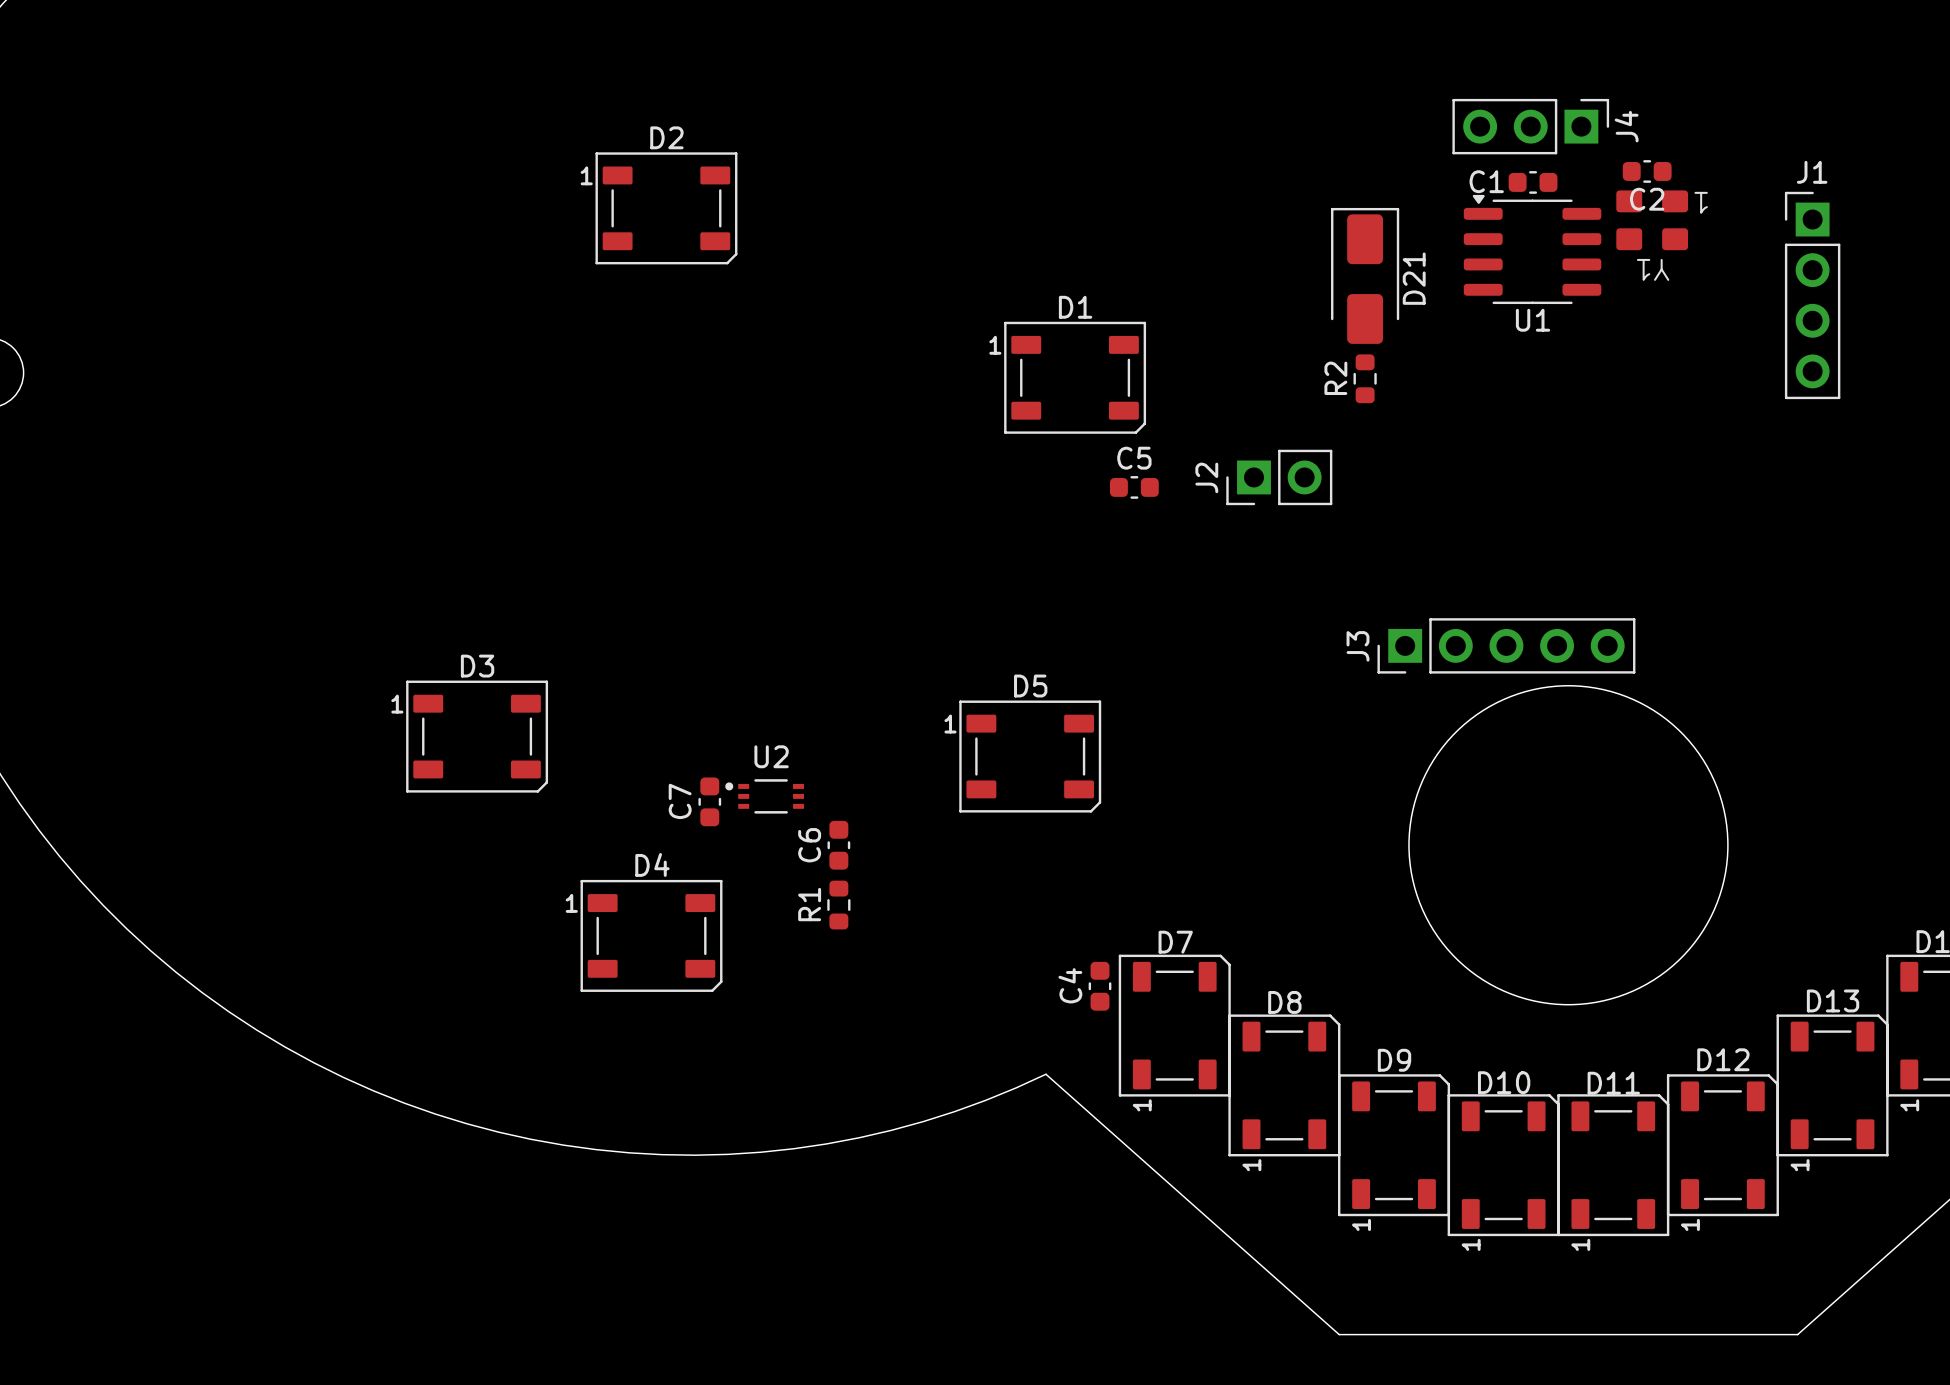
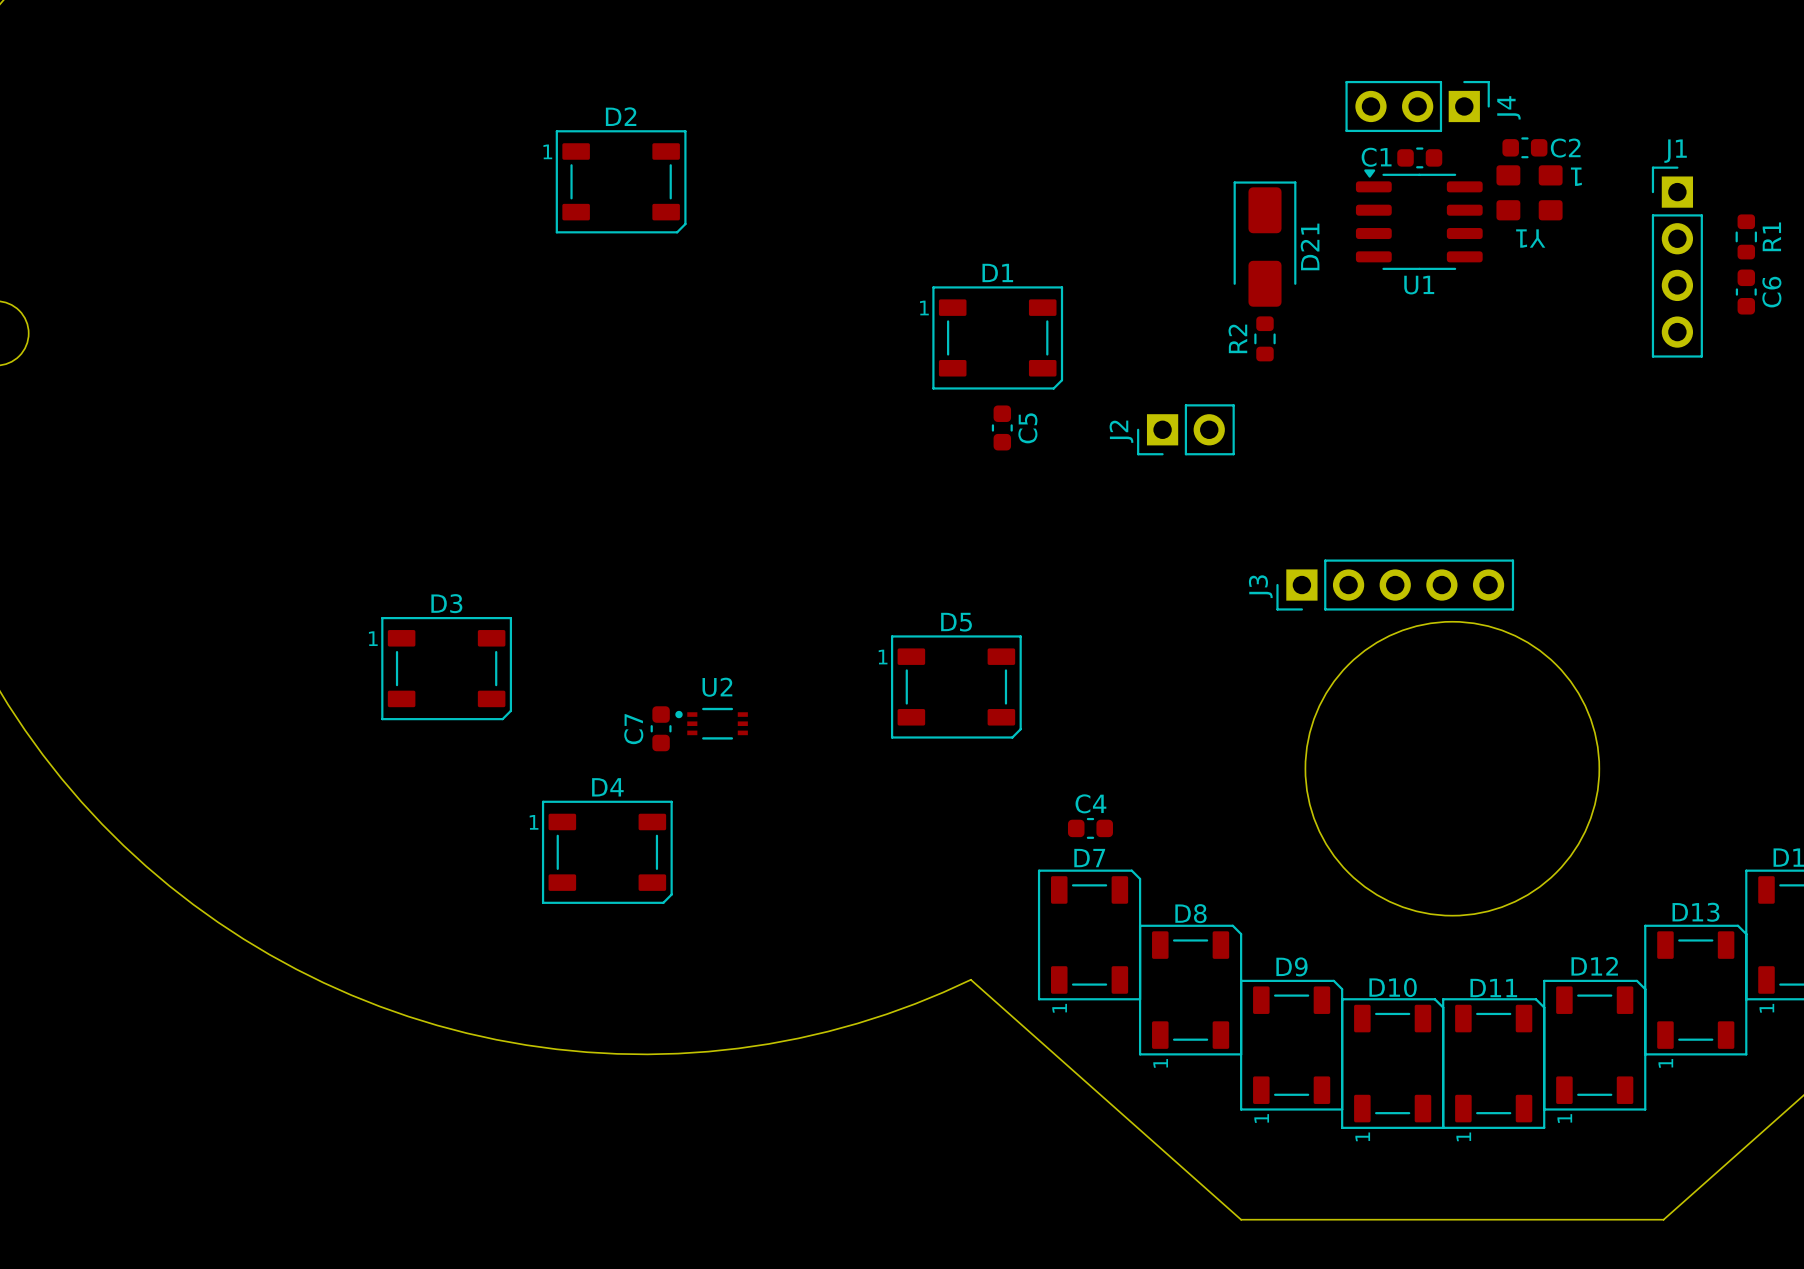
C2 name position: C2 (1647, 199) -> C2 (1565, 148)
C5 rotation: 0° (1134, 487) -> 90° clockwise (1002, 427)
C5 position: (1134, 487) -> (1002, 427)
C6 name position: C6 (809, 845) -> C6 (1771, 292)
C6 position: (838, 845) -> (1746, 292)
R1 name position: R1 (809, 904) -> R1 (1771, 236)
R1 position: (838, 905) -> (1746, 236)
C4 rotation: 0° (1100, 986) -> 90° clockwise (1090, 828)
C4 position: (1100, 986) -> (1090, 828)

